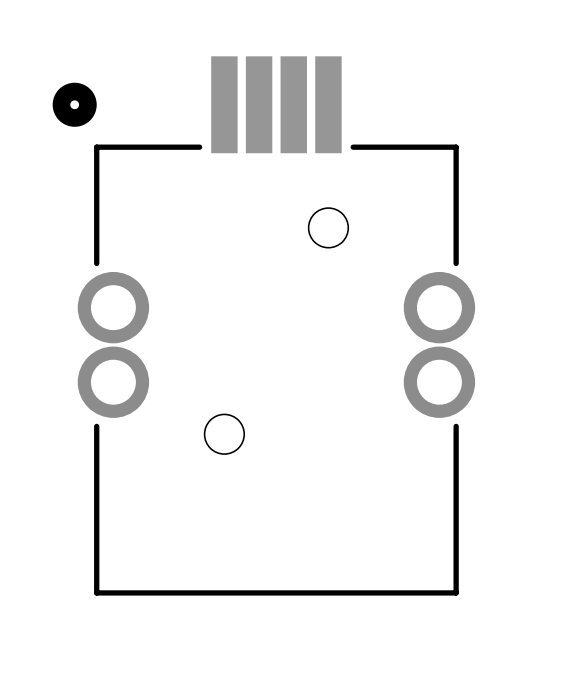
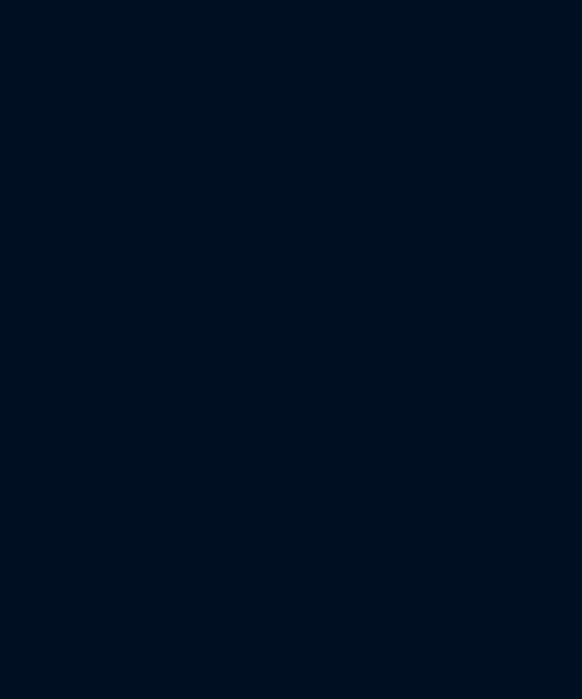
part: (263, 325) -> none

